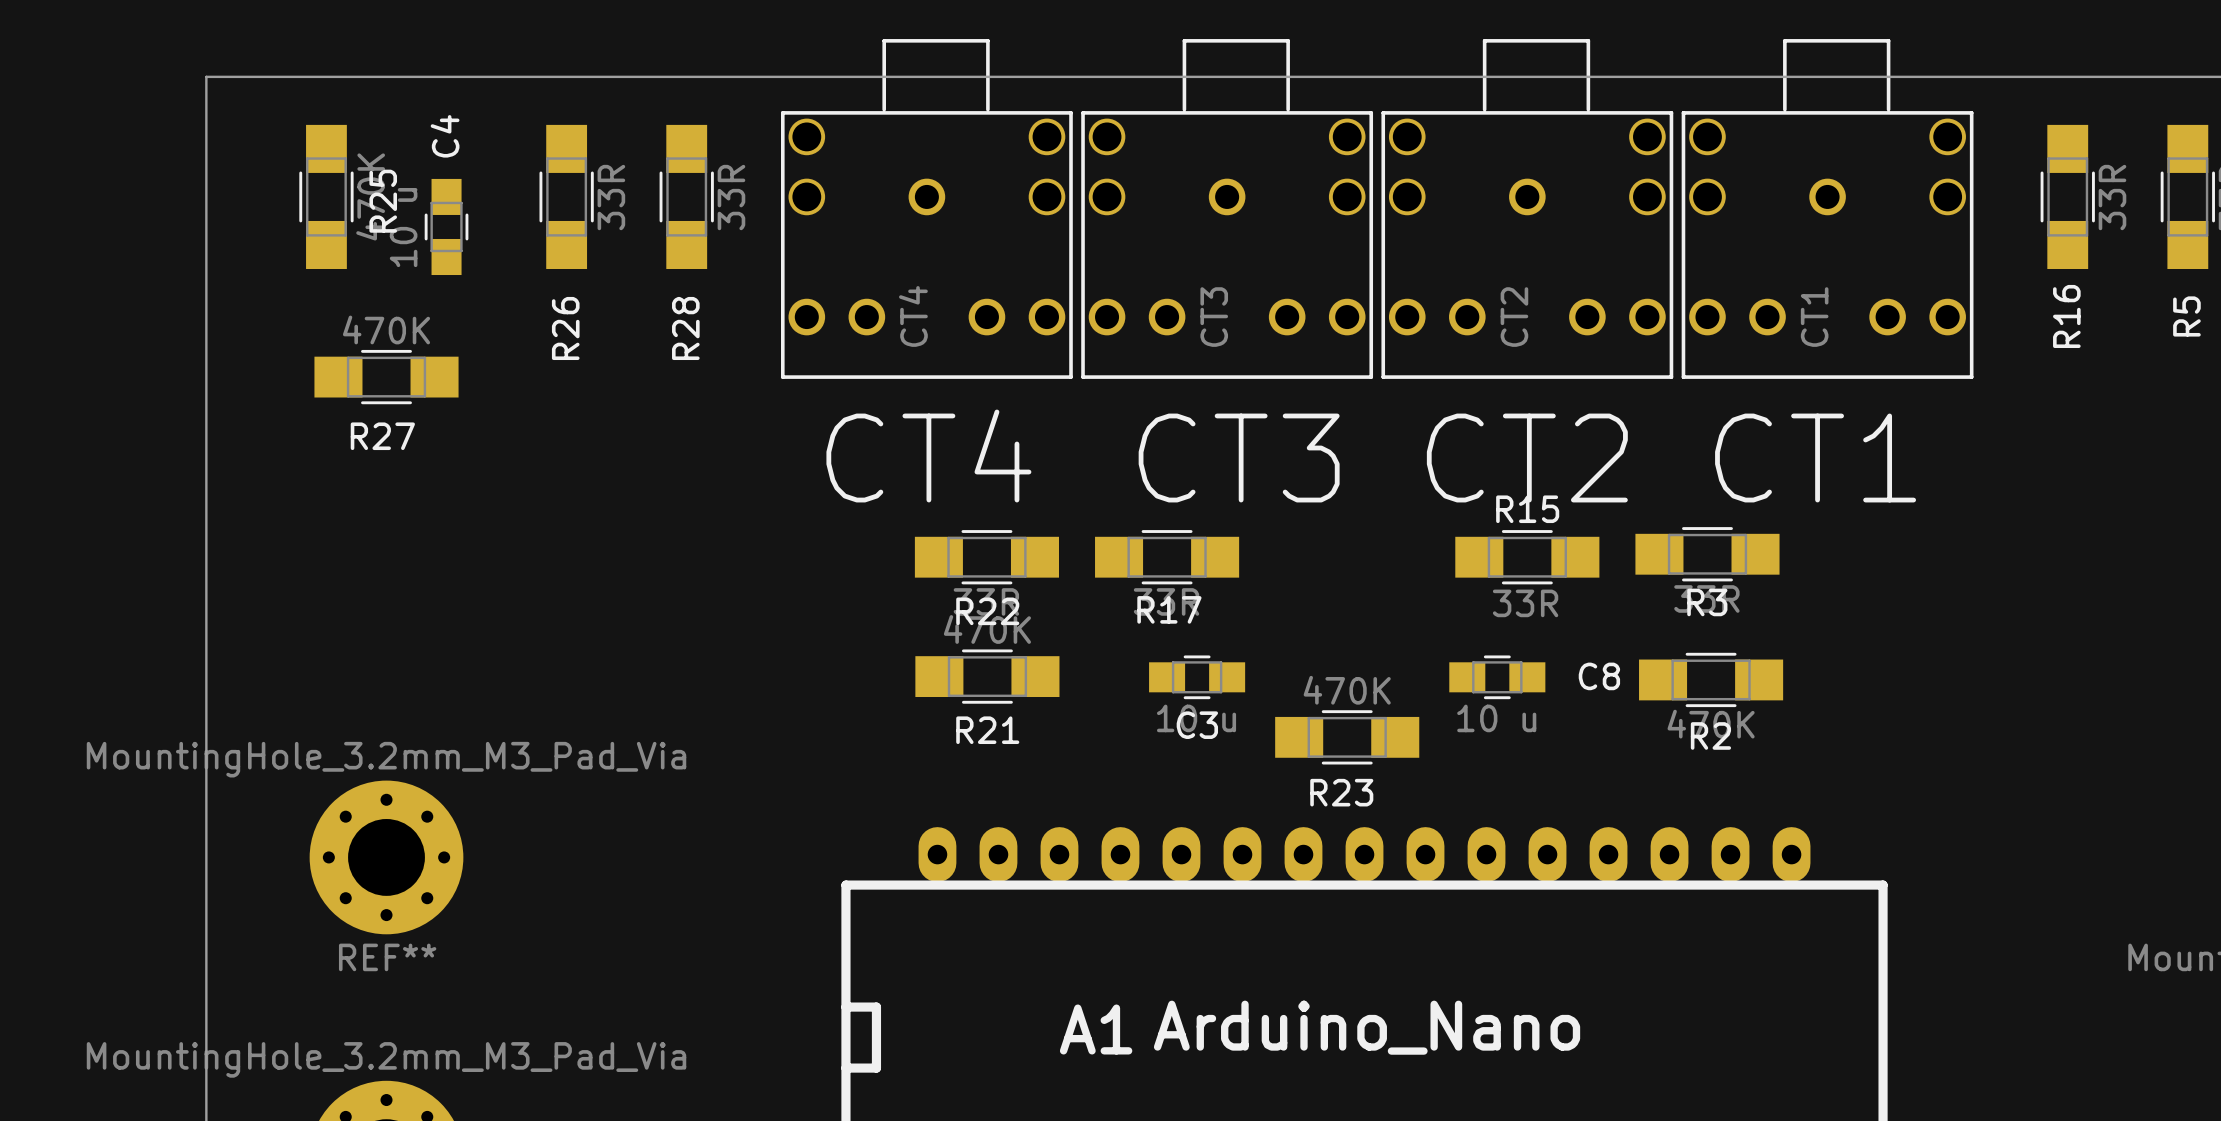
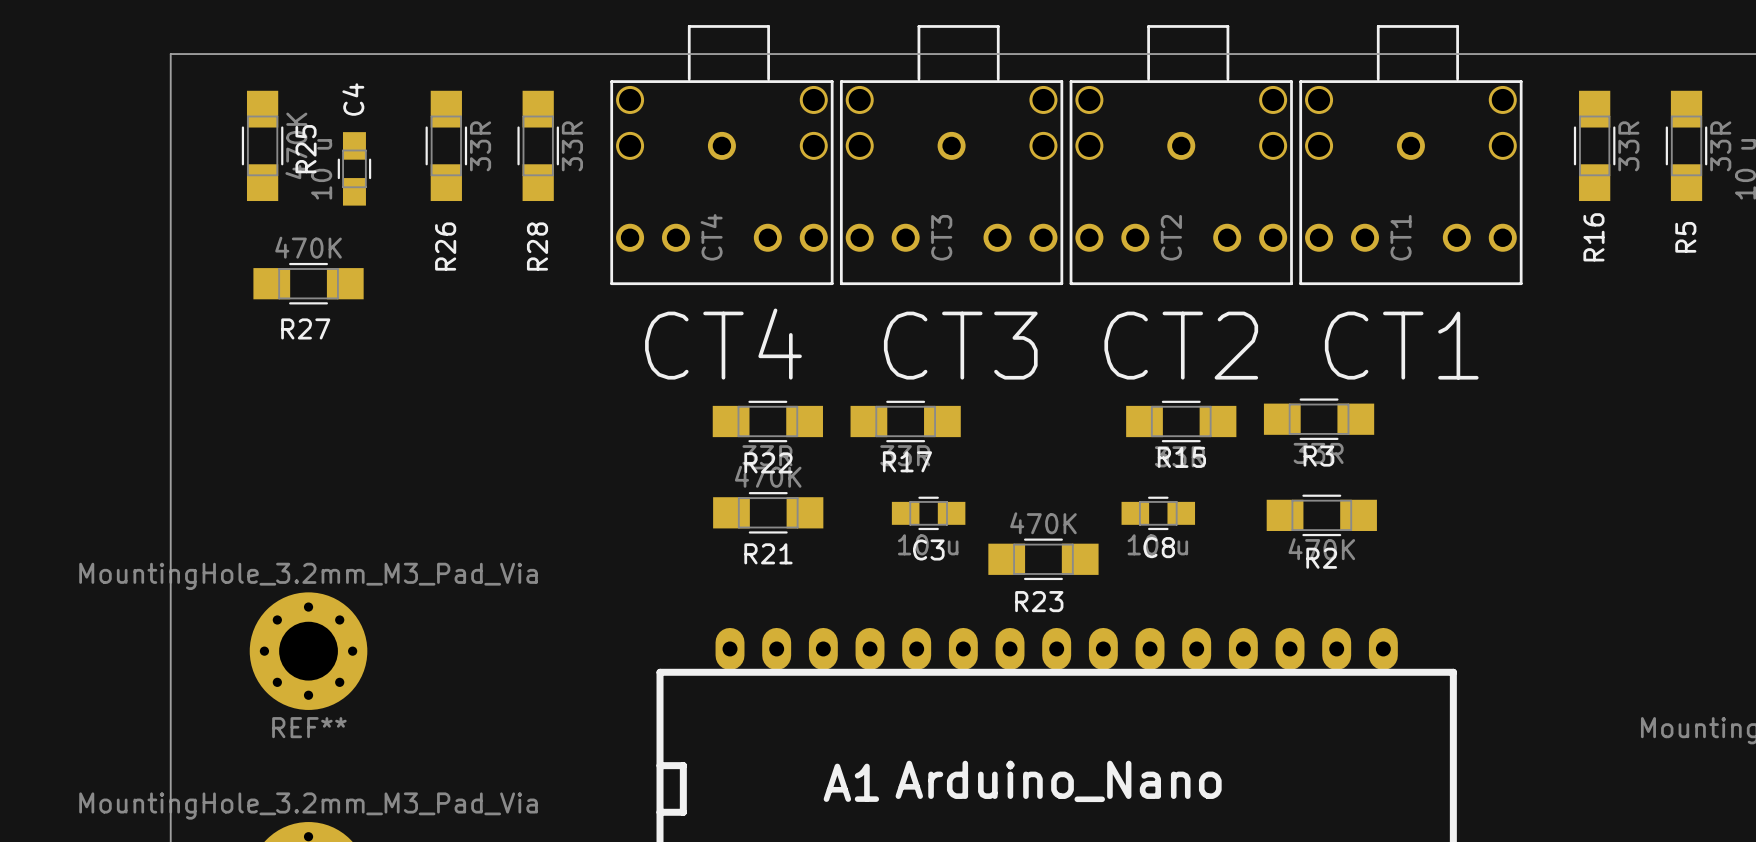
R15 name position: R15 (1527, 509) -> R15 (1181, 457)
C8 name position: C8 (1599, 676) -> C8 (1159, 547)

